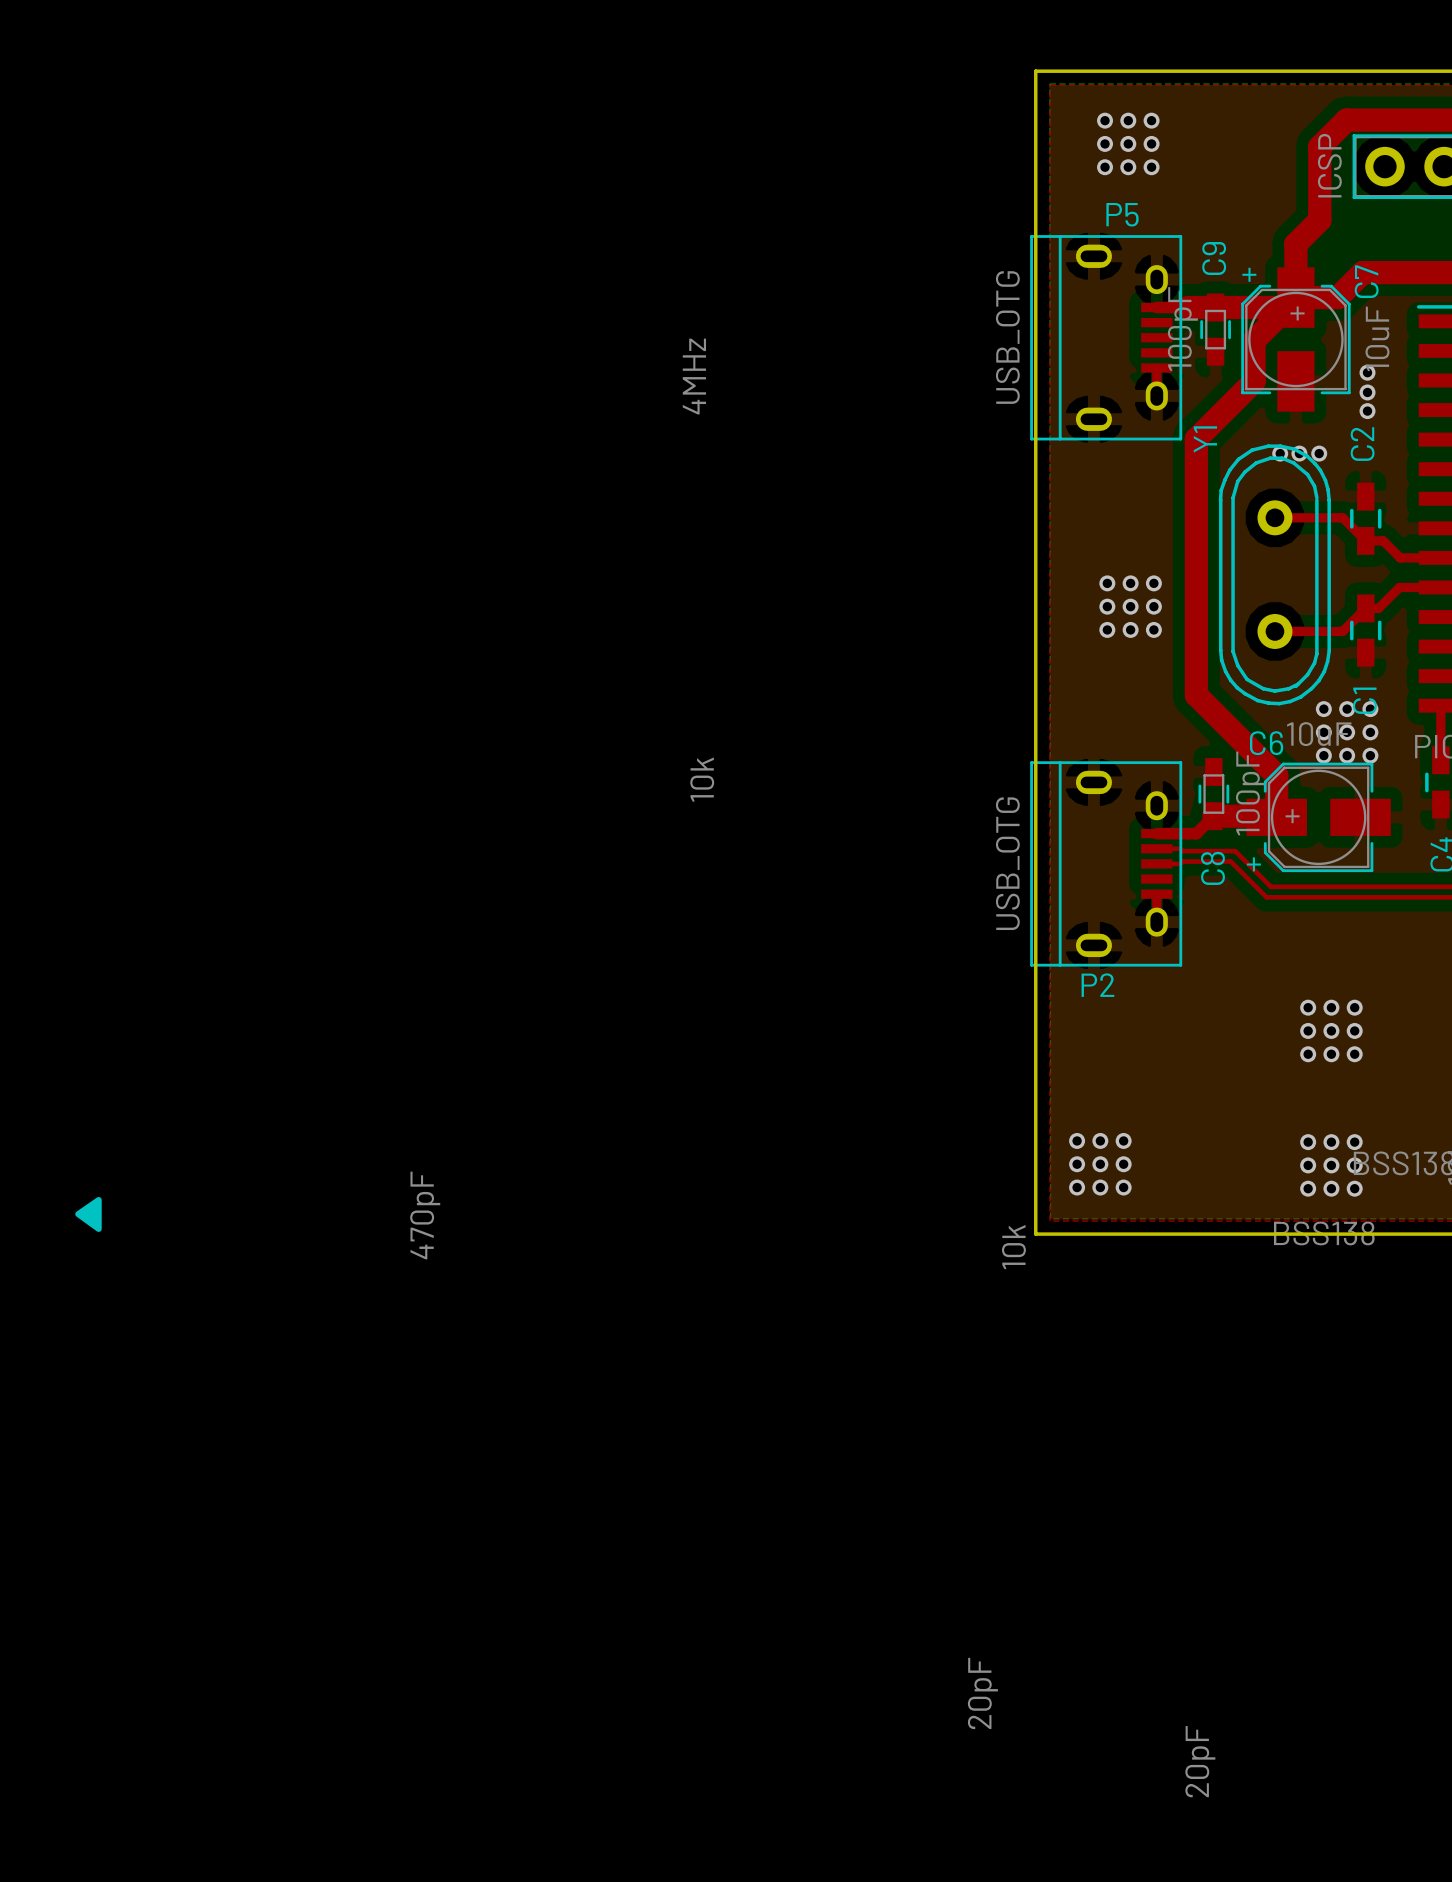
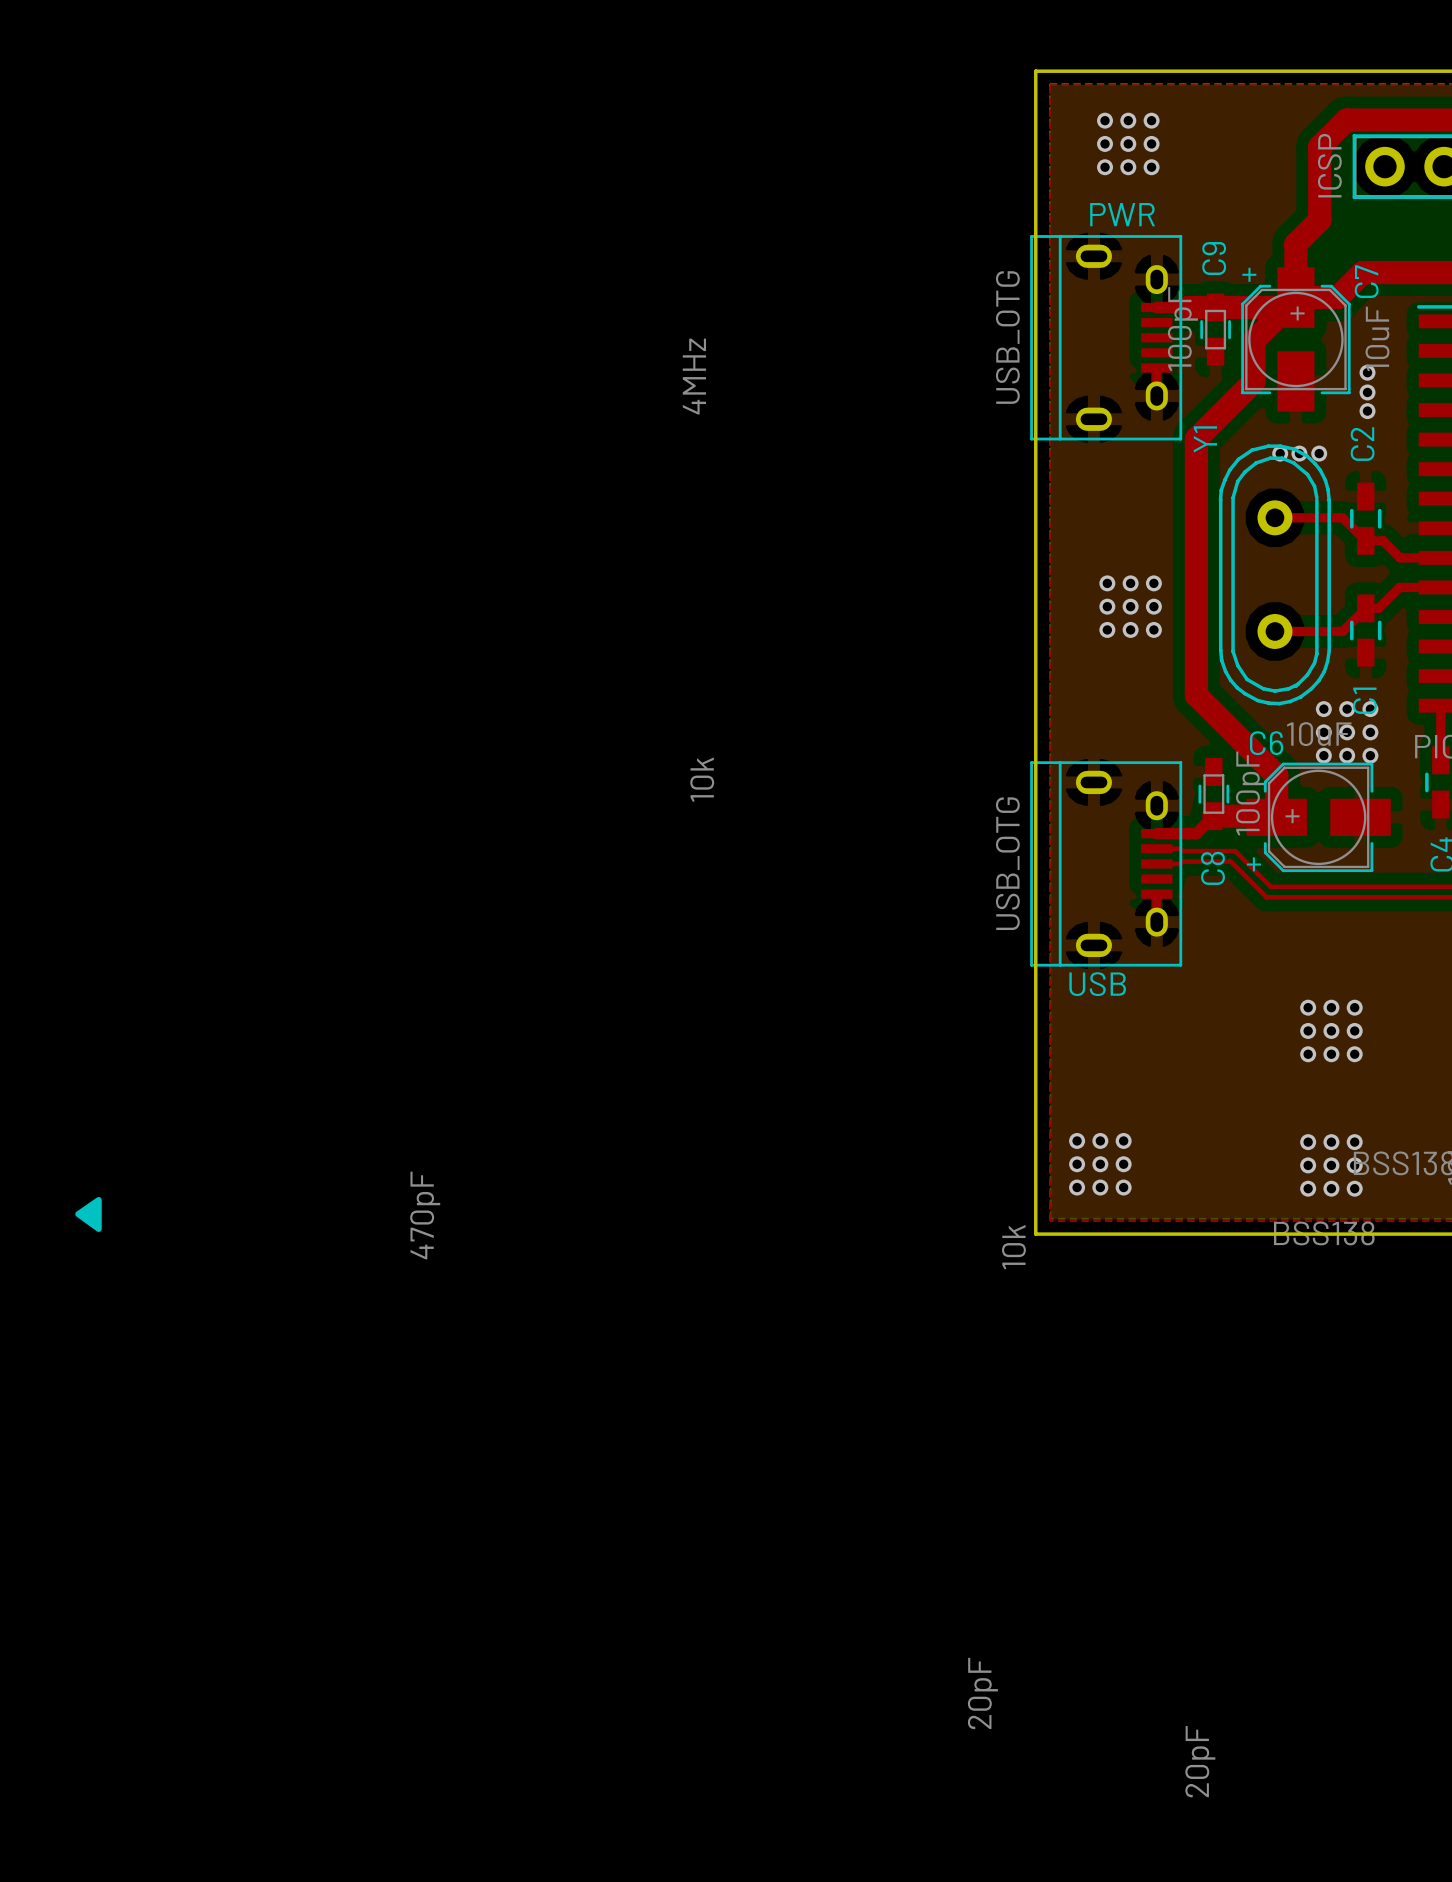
P5 name: P5 (1122, 214) -> PWR (1122, 214)
P2 name: P2 (1097, 985) -> USB (1097, 984)

